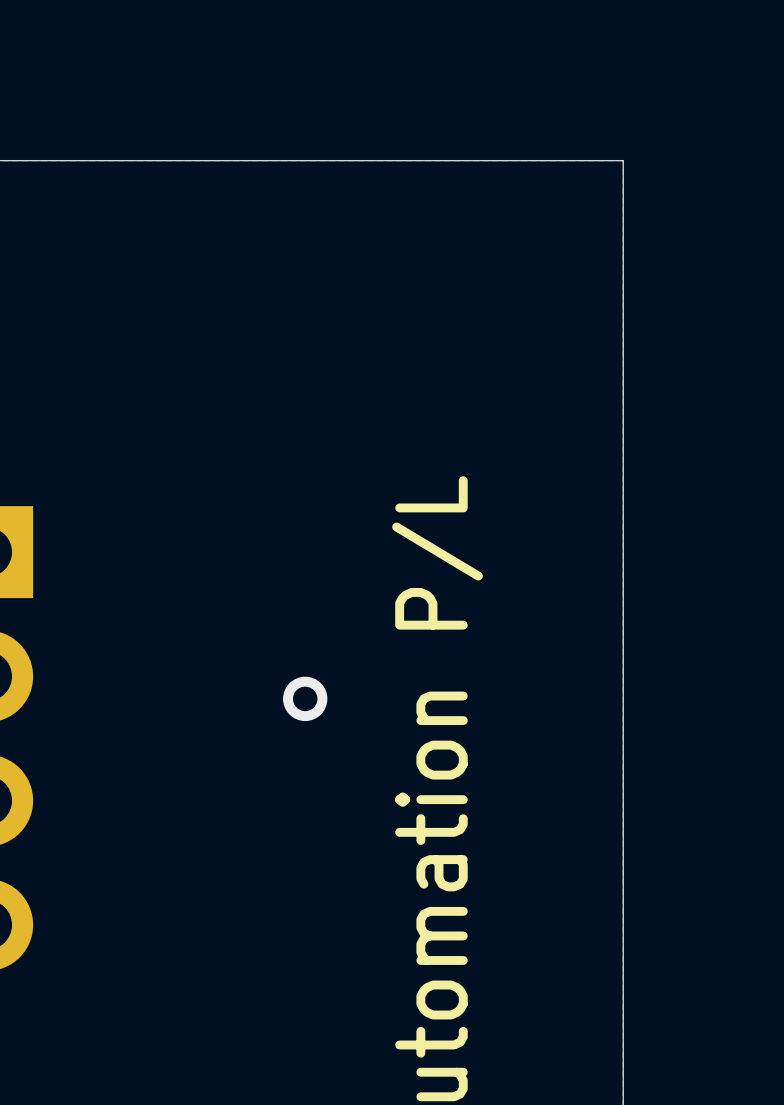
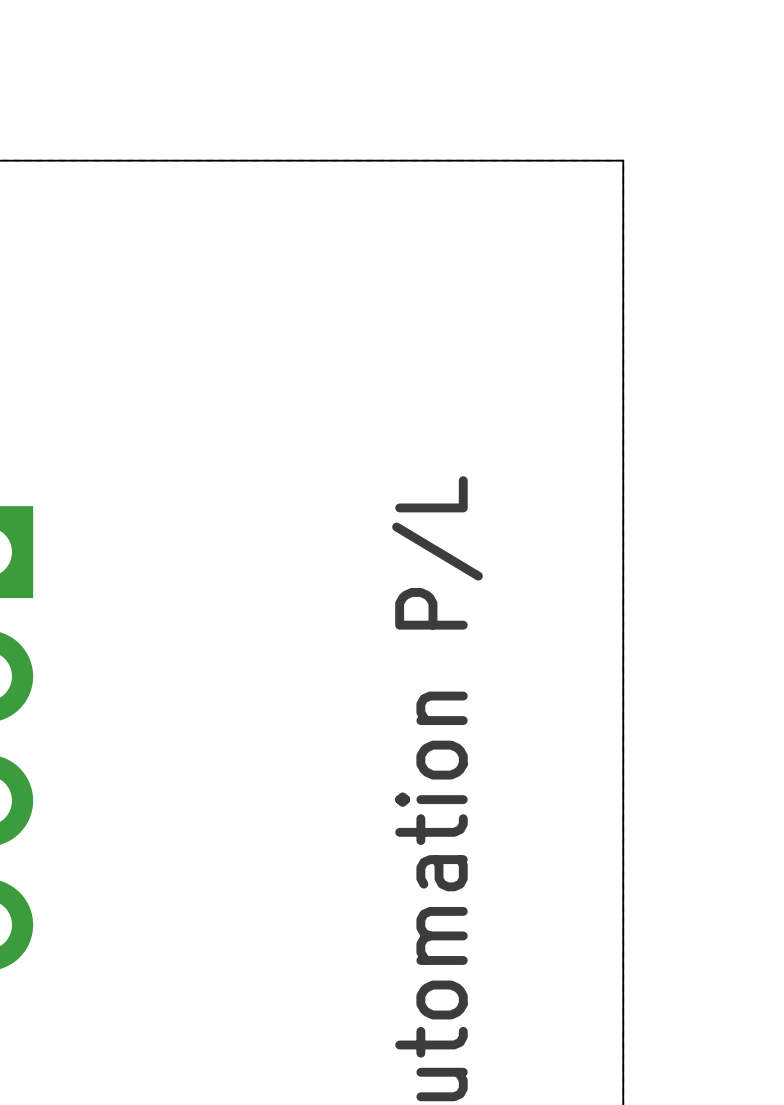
via: (305, 698) -> none

